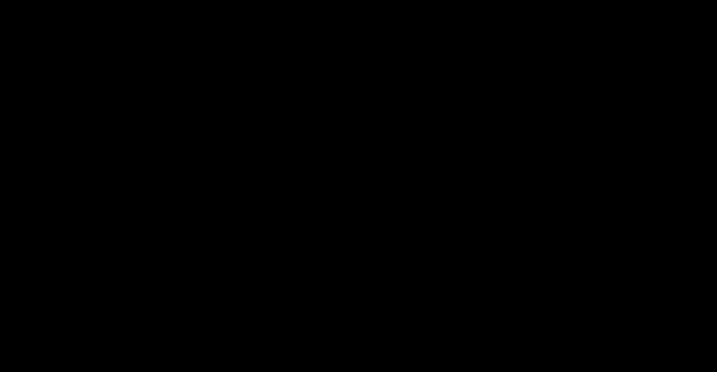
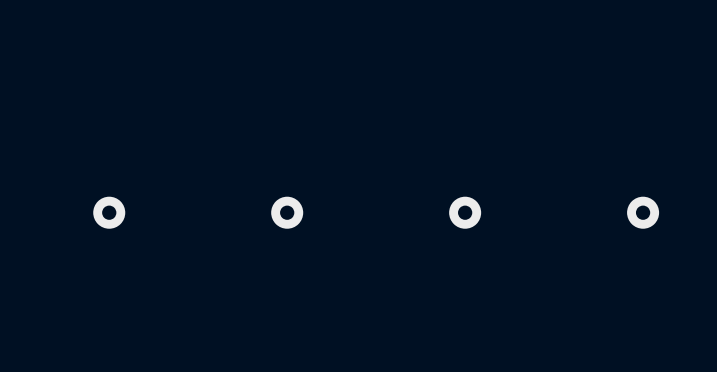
via: none -> (109, 212)
via: none -> (287, 212)
via: none -> (465, 212)
via: none -> (643, 212)

